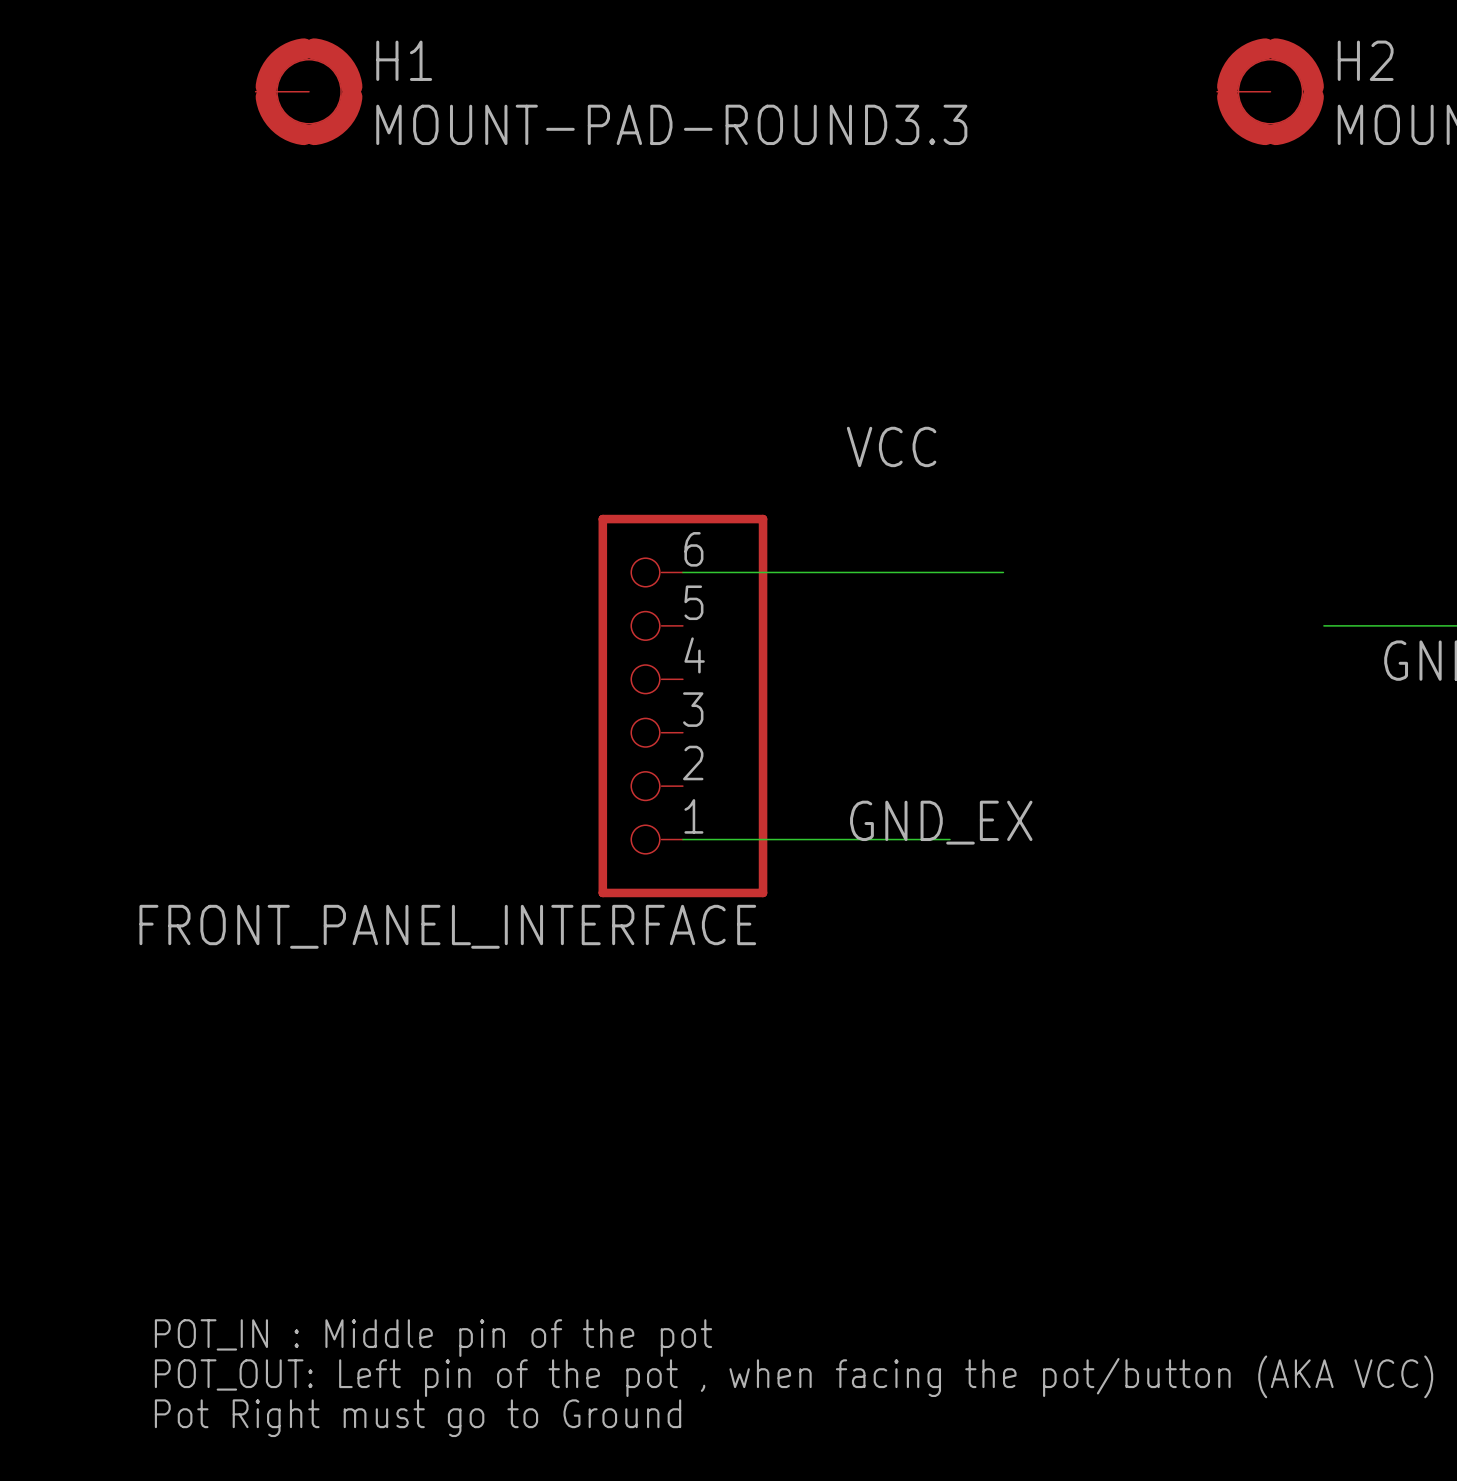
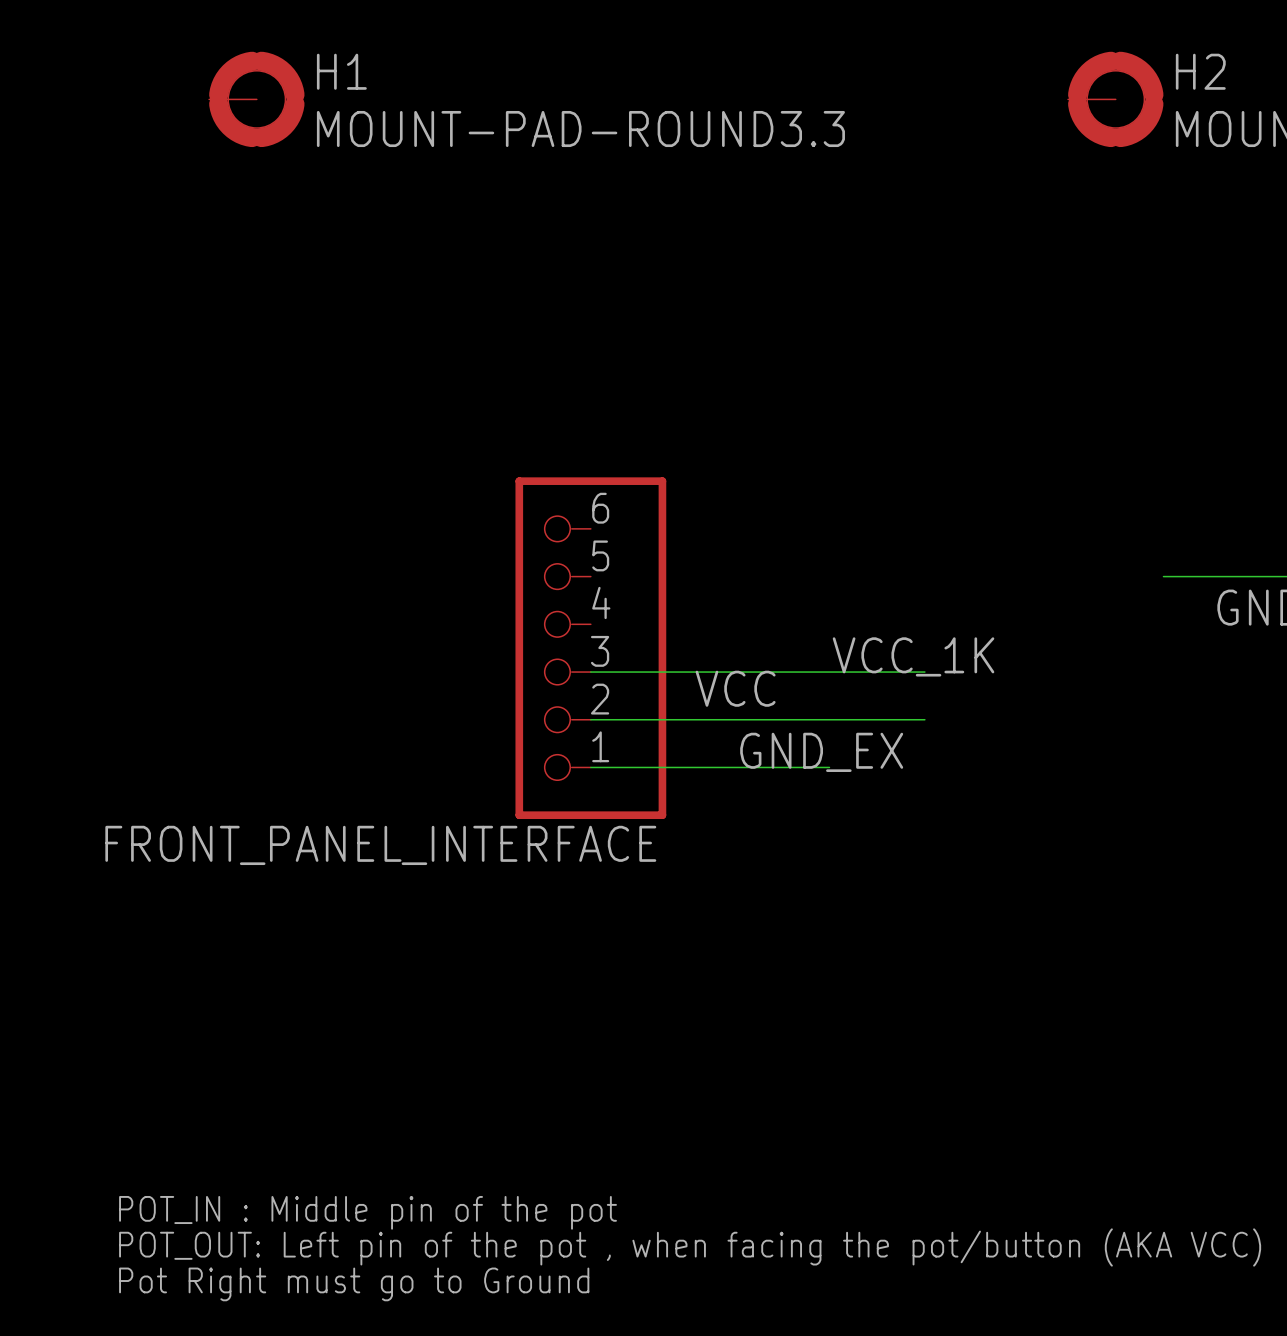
label position: VCC (891, 446) -> VCC (735, 688)
wire: (682, 572) (1003, 572) -> none
label: none -> VCC_1K (913, 656)
wire: none -> (590, 672) (924, 672)
wire: none -> (590, 719) (924, 719)

